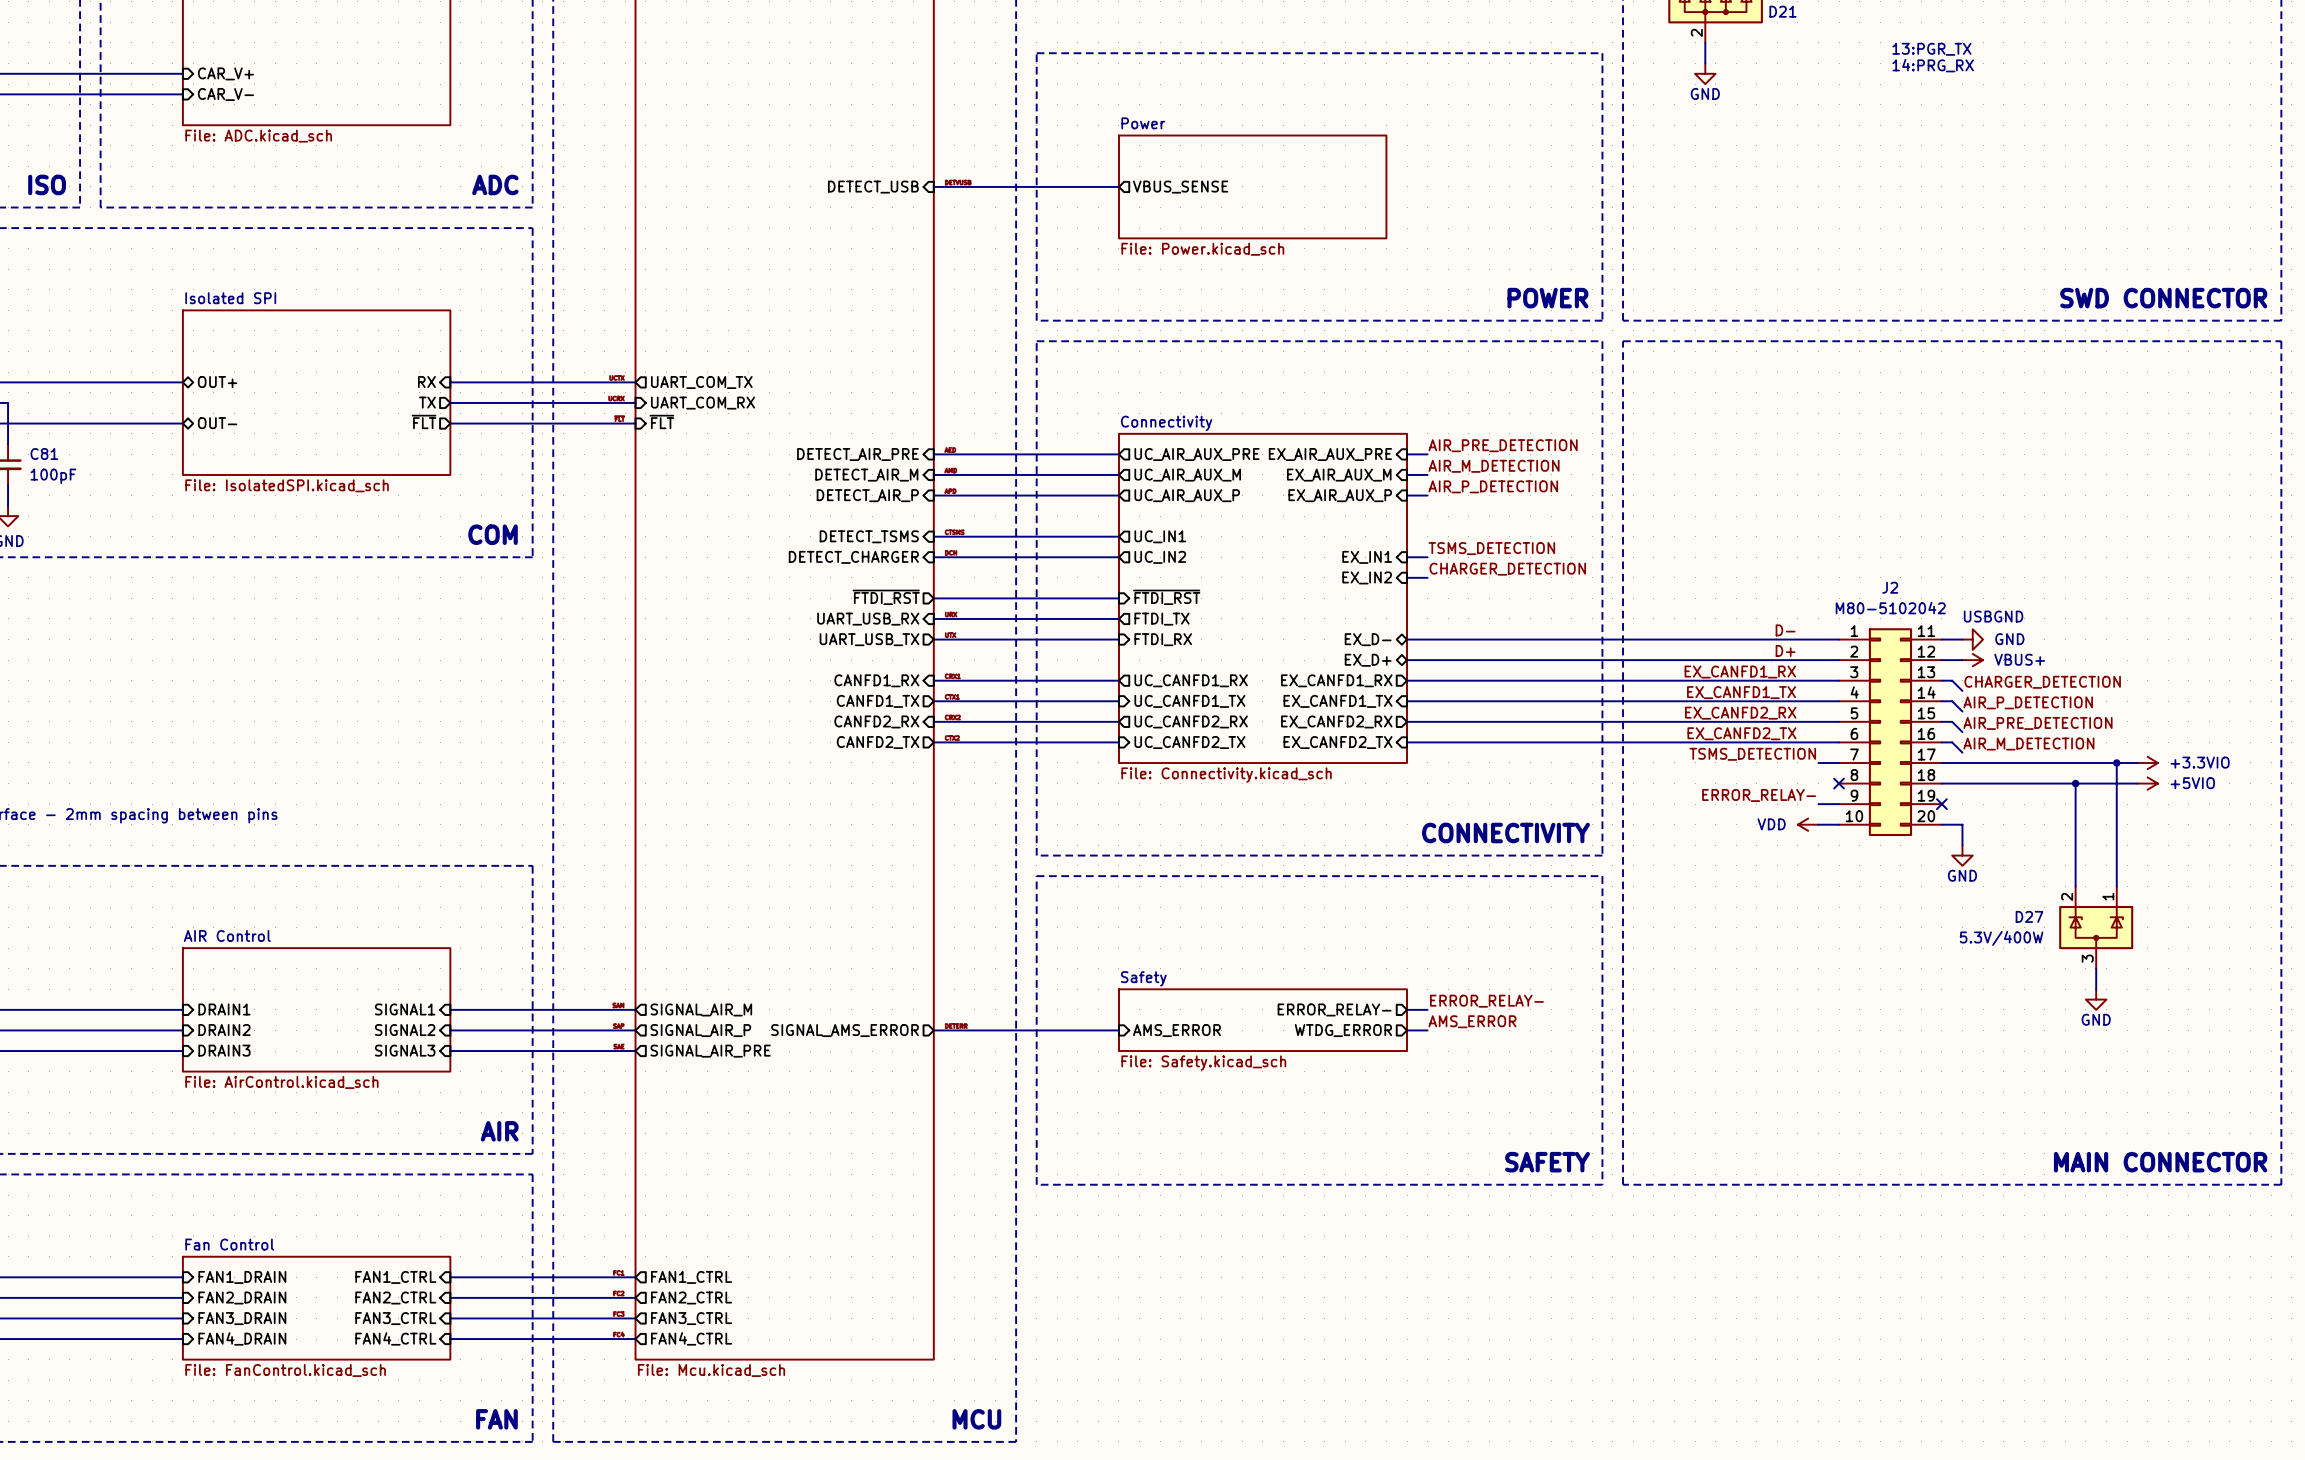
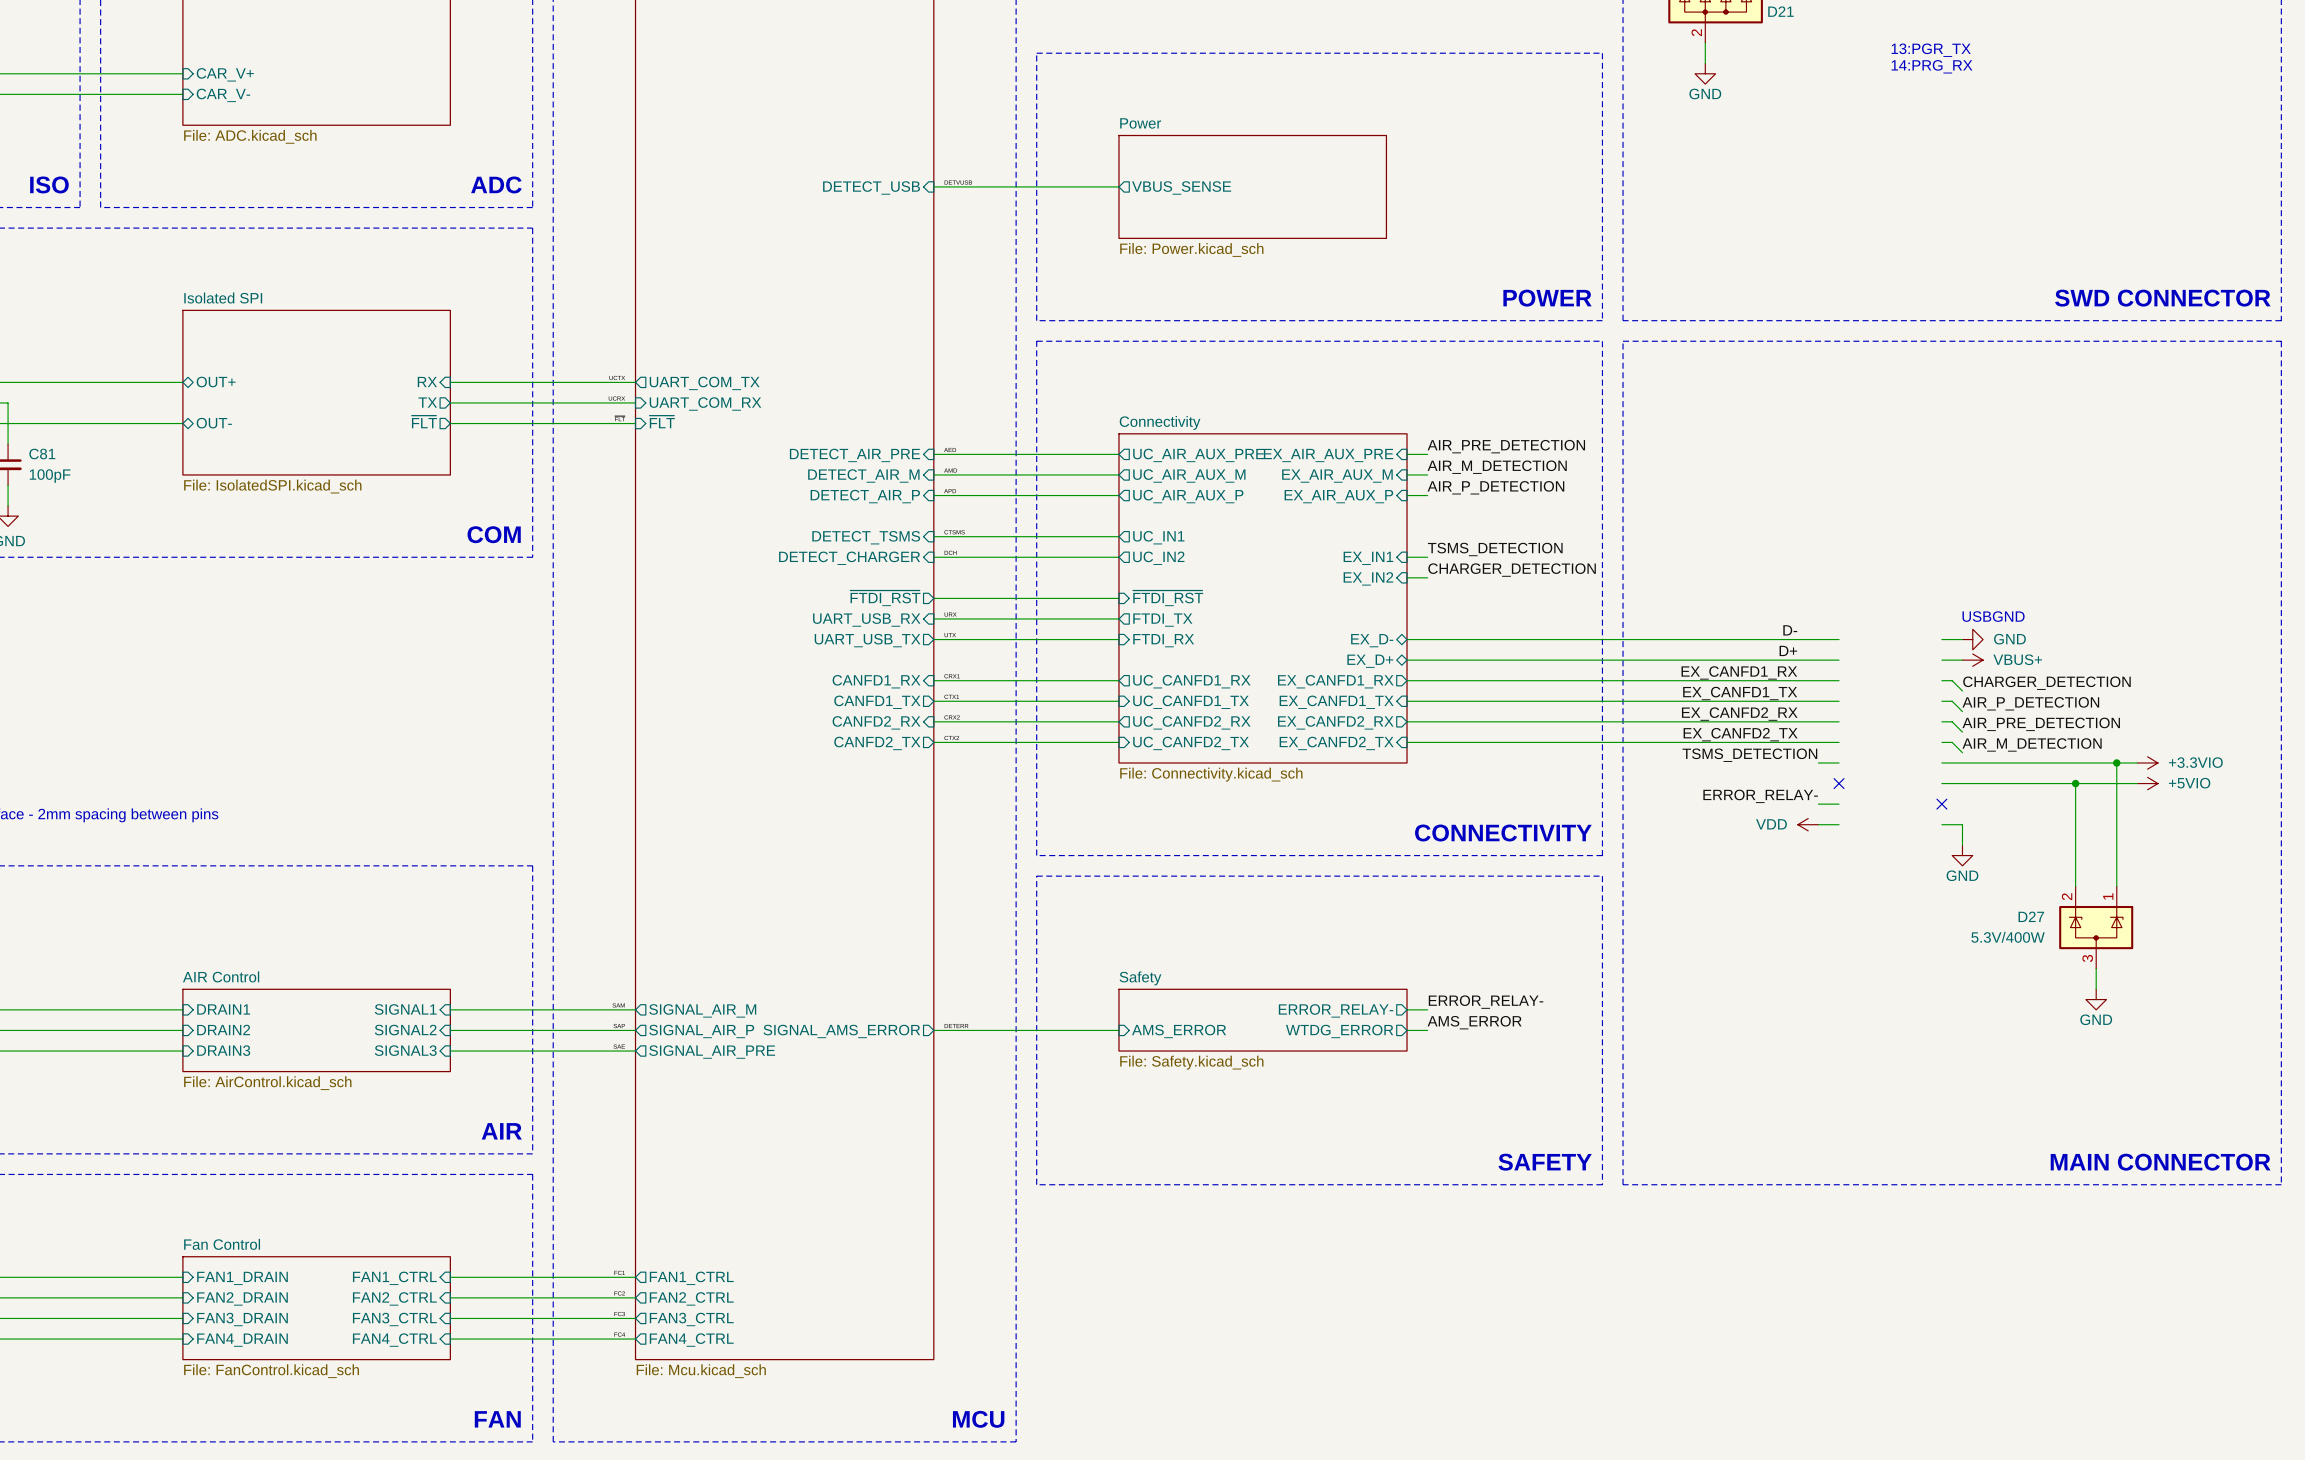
J2: M80-5102042 (1890, 732) -> none
sheet AIR Control: File: AirControl.kicad_sch (316, 1009) -> none
sheet AIR Control: none -> File: AirControl.kicad_sch (316, 1030)

